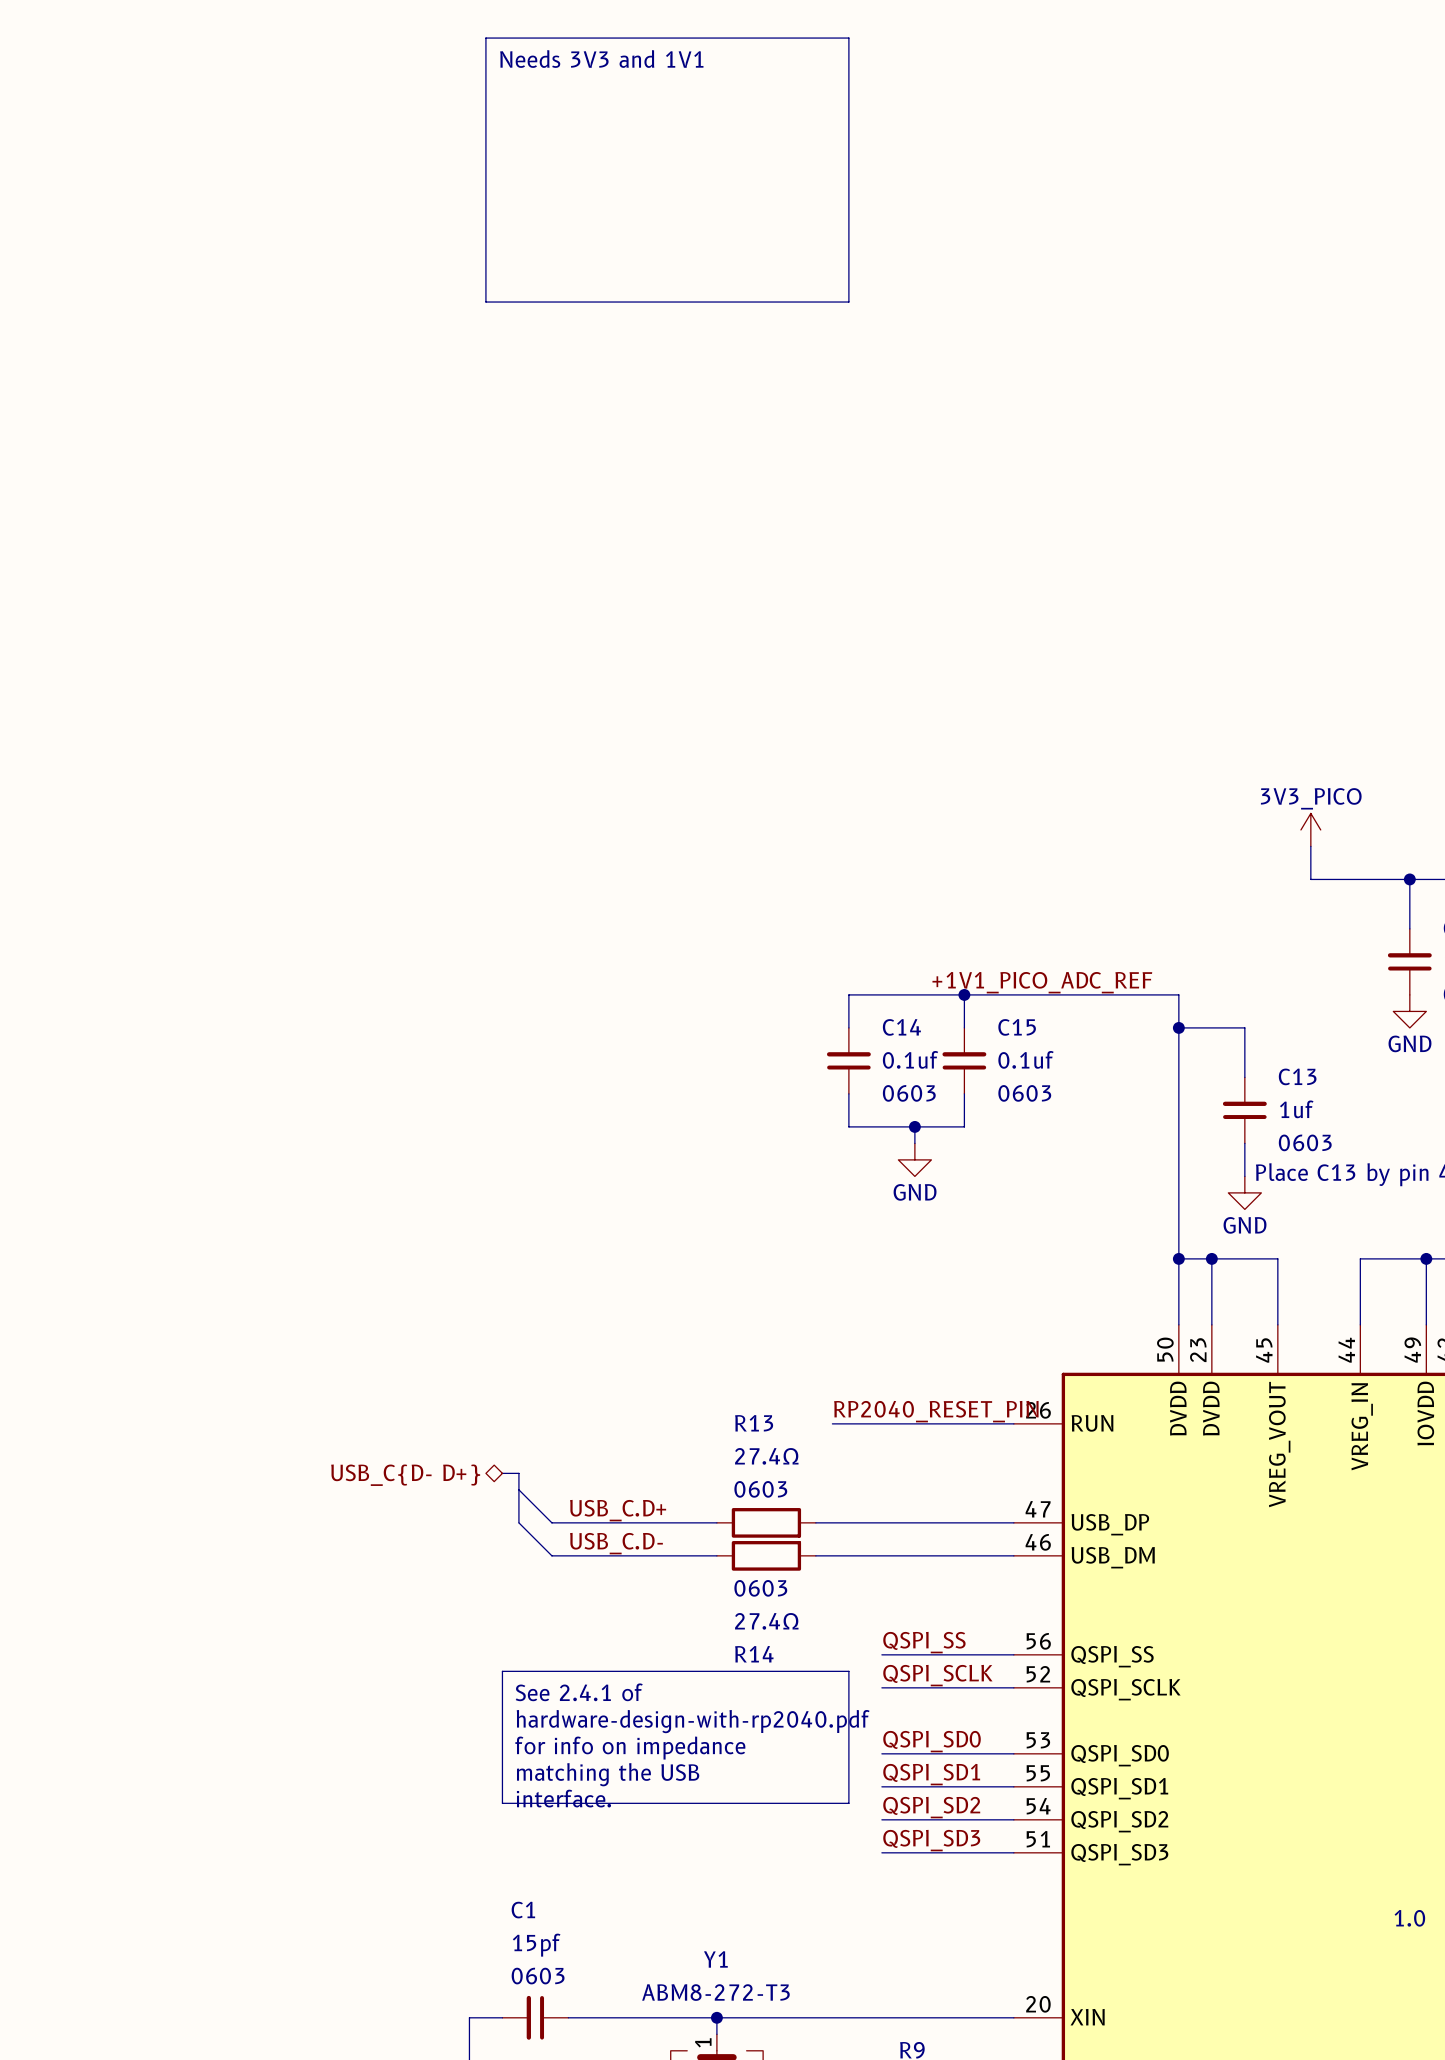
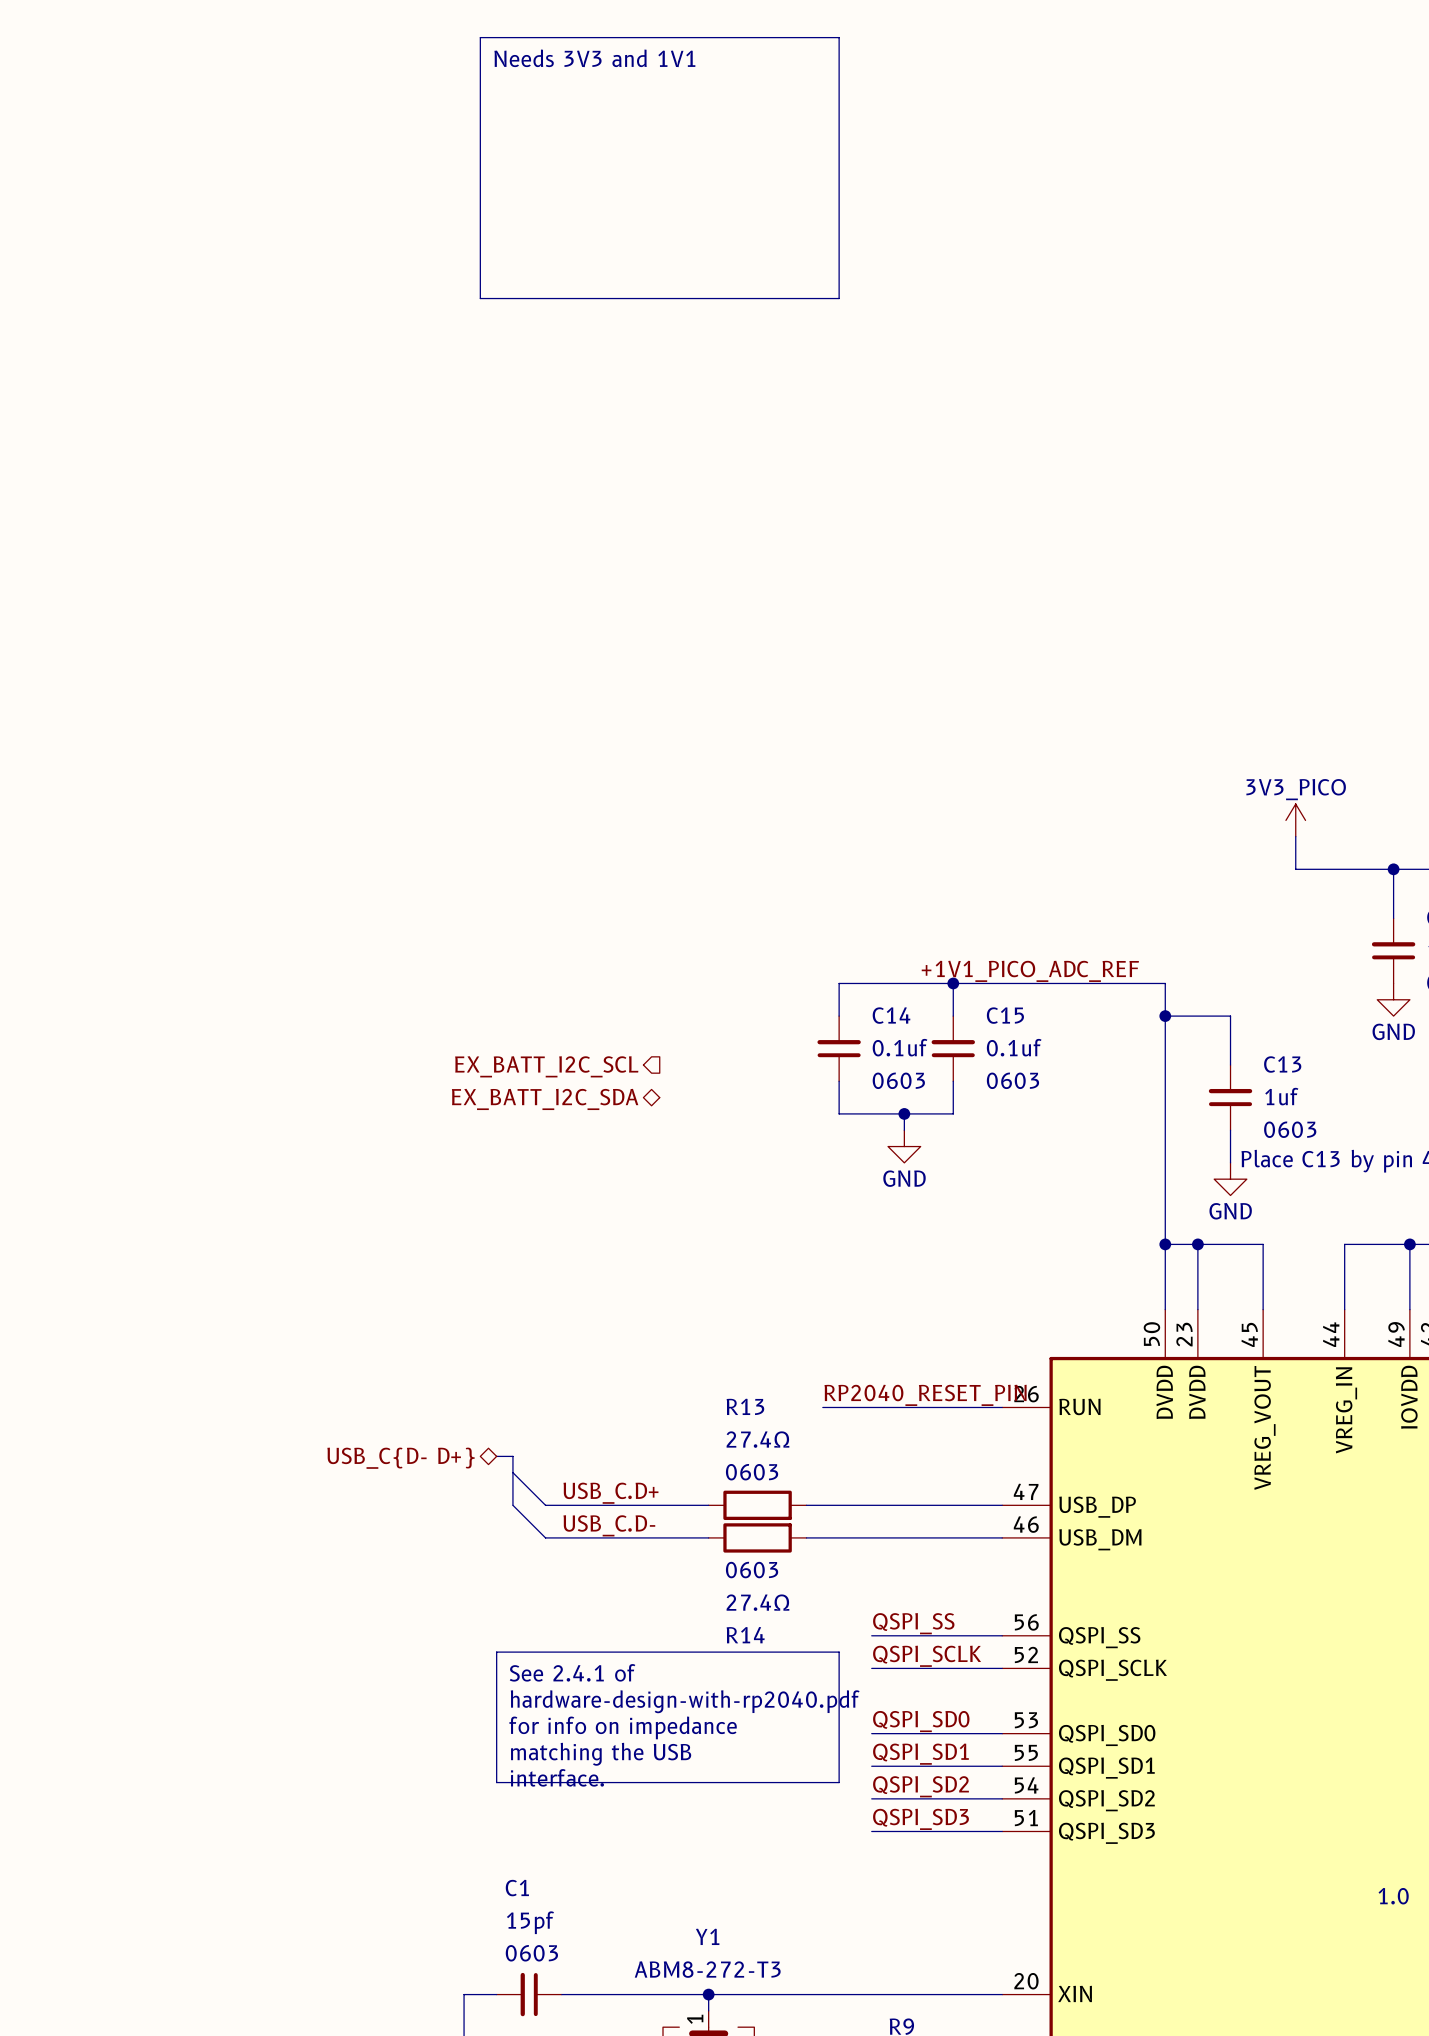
hierarchical label: none -> EX_BATT_I2C_SCL (546, 1066)
hierarchical label: none -> EX_BATT_I2C_SDA (545, 1099)

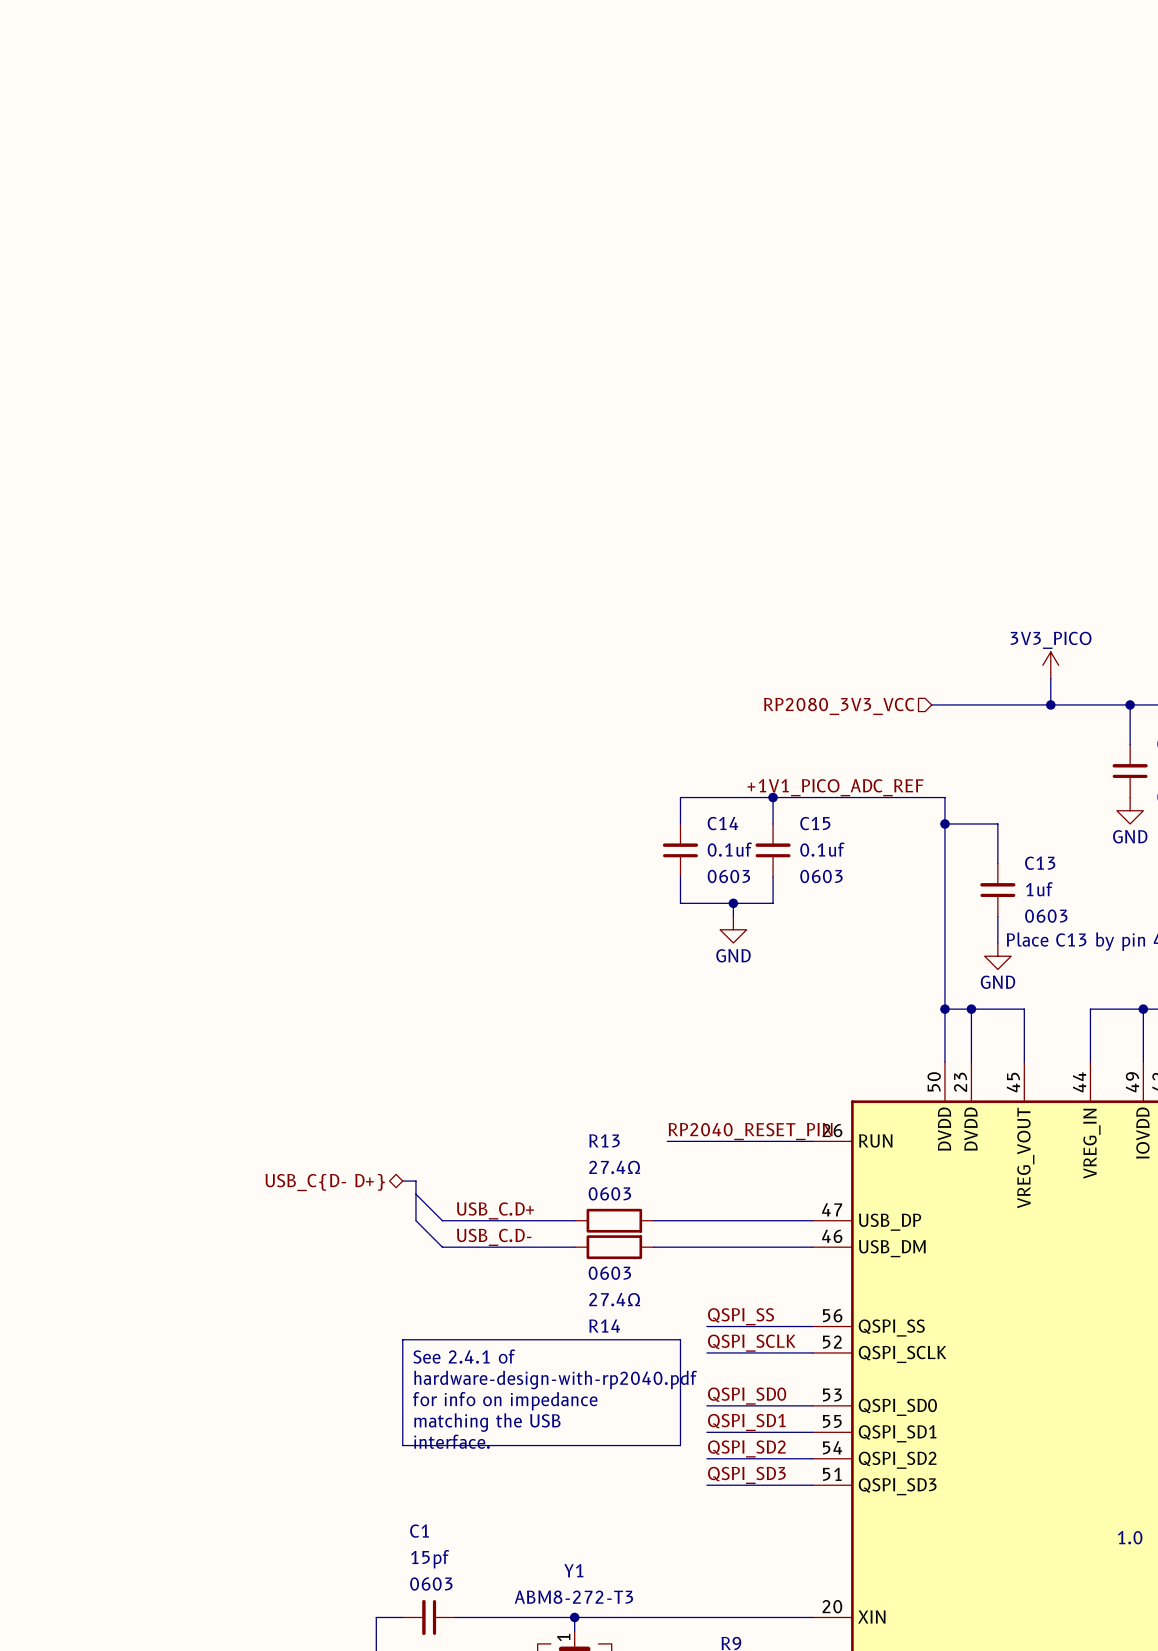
line: (480, 37) (839, 37) (839, 298) (480, 298) (480, 37) -> none
text: Needs 3V3 and 1V1 (594, 58) -> none
wire: none -> (931, 704) (1050, 704)
junction: none -> (1050, 704)
hierarchical label: none -> RP2080_3V3_VCC (839, 706)
hierarchical label: EX_BATT_I2C_SCL (546, 1066) -> none
hierarchical label: EX_BATT_I2C_SDA (545, 1099) -> none

